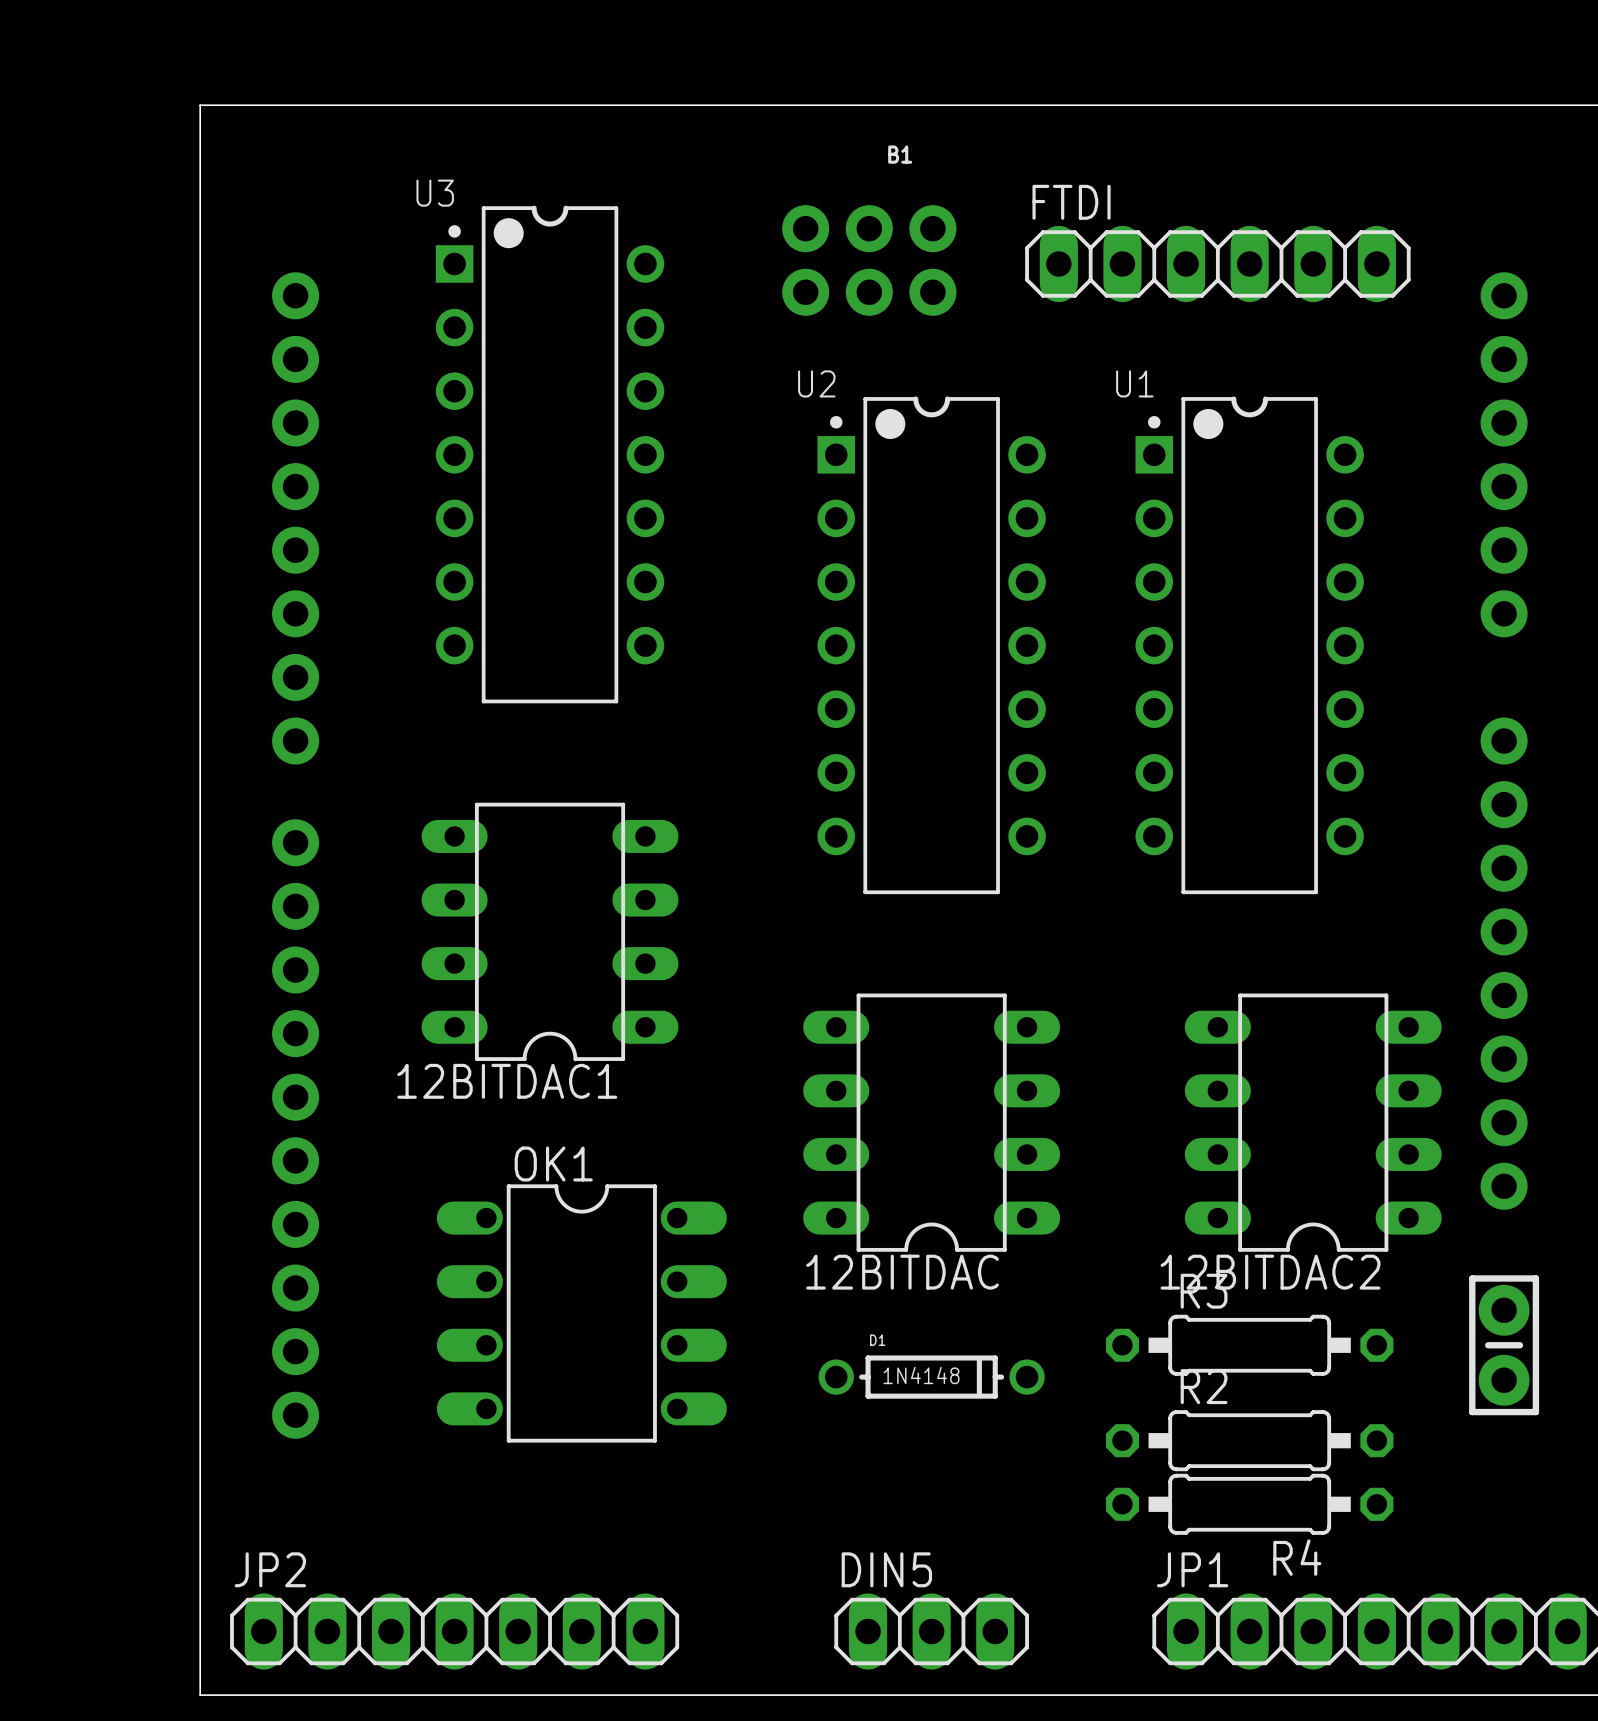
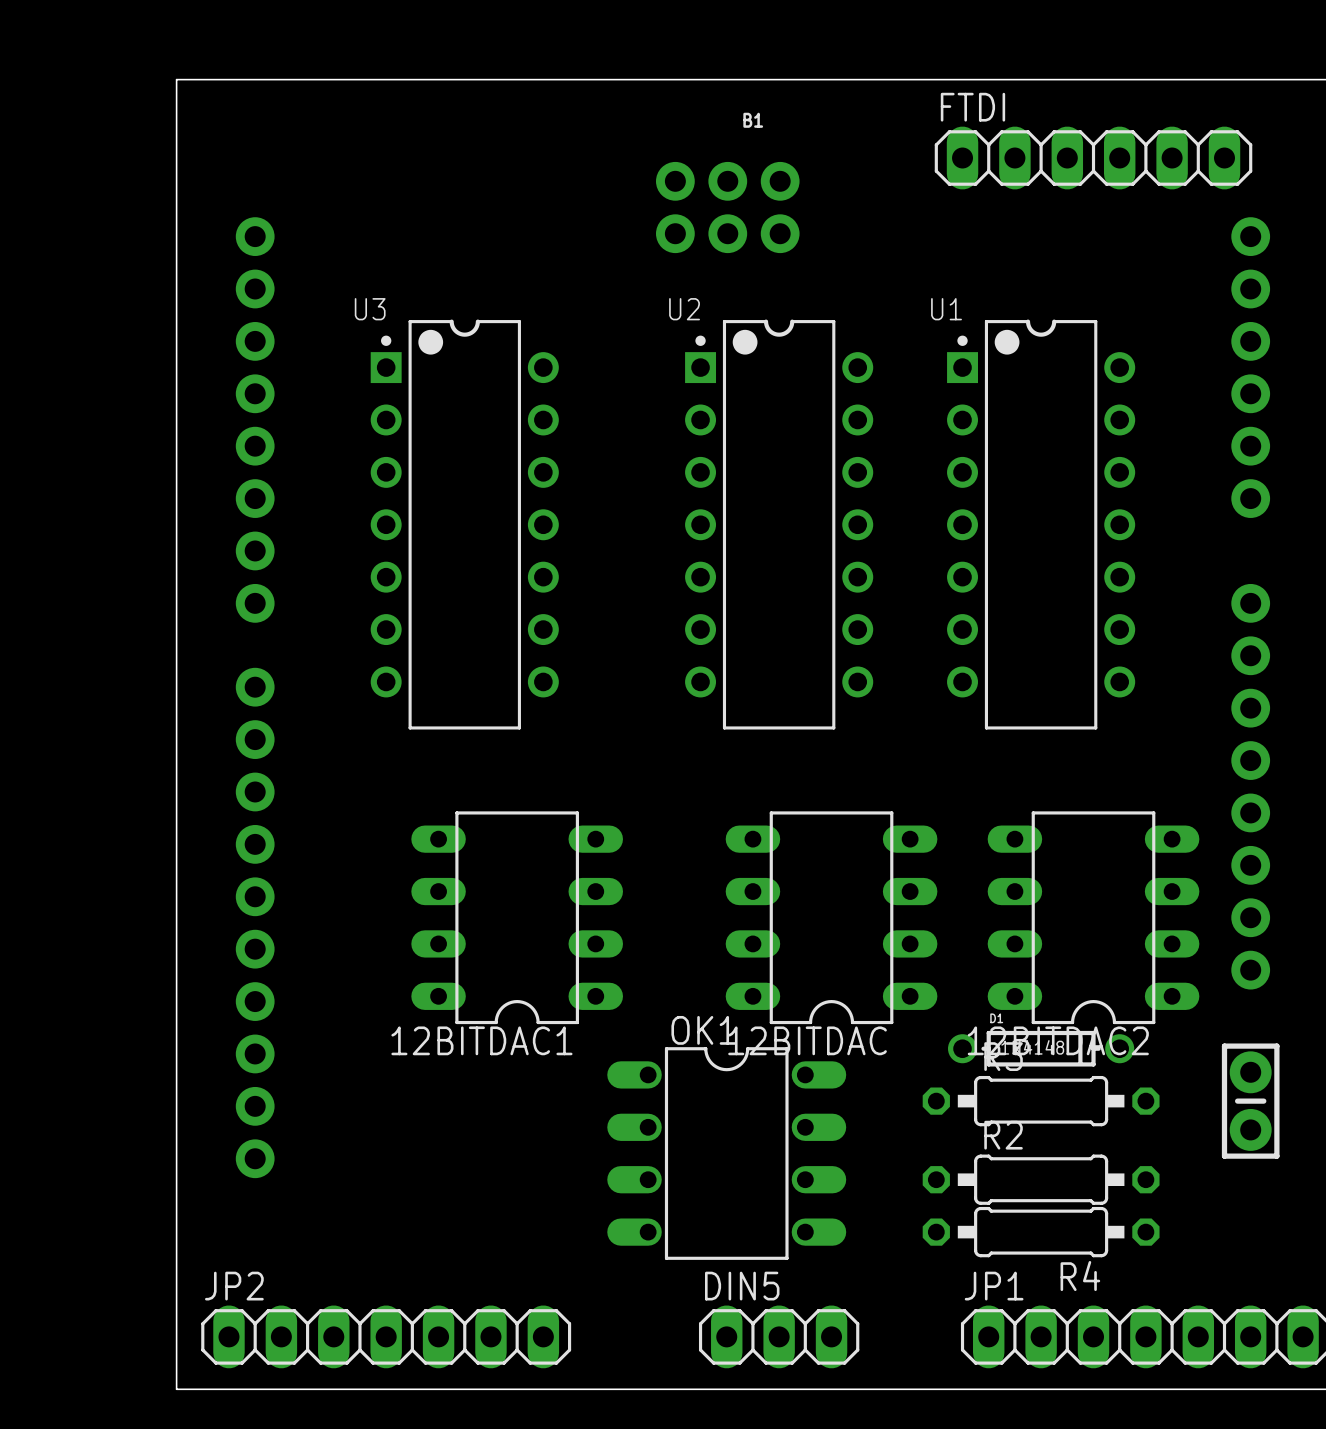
FTDI position: (1217, 263) -> (1093, 158)
U3 position: (550, 454) -> (464, 524)
12BITDAC1 position: (550, 931) -> (517, 917)
12BITDAC position: (931, 1122) -> (831, 917)
OK1 position: (581, 1313) -> (726, 1153)
D1 position: (931, 1377) -> (1041, 1048)

